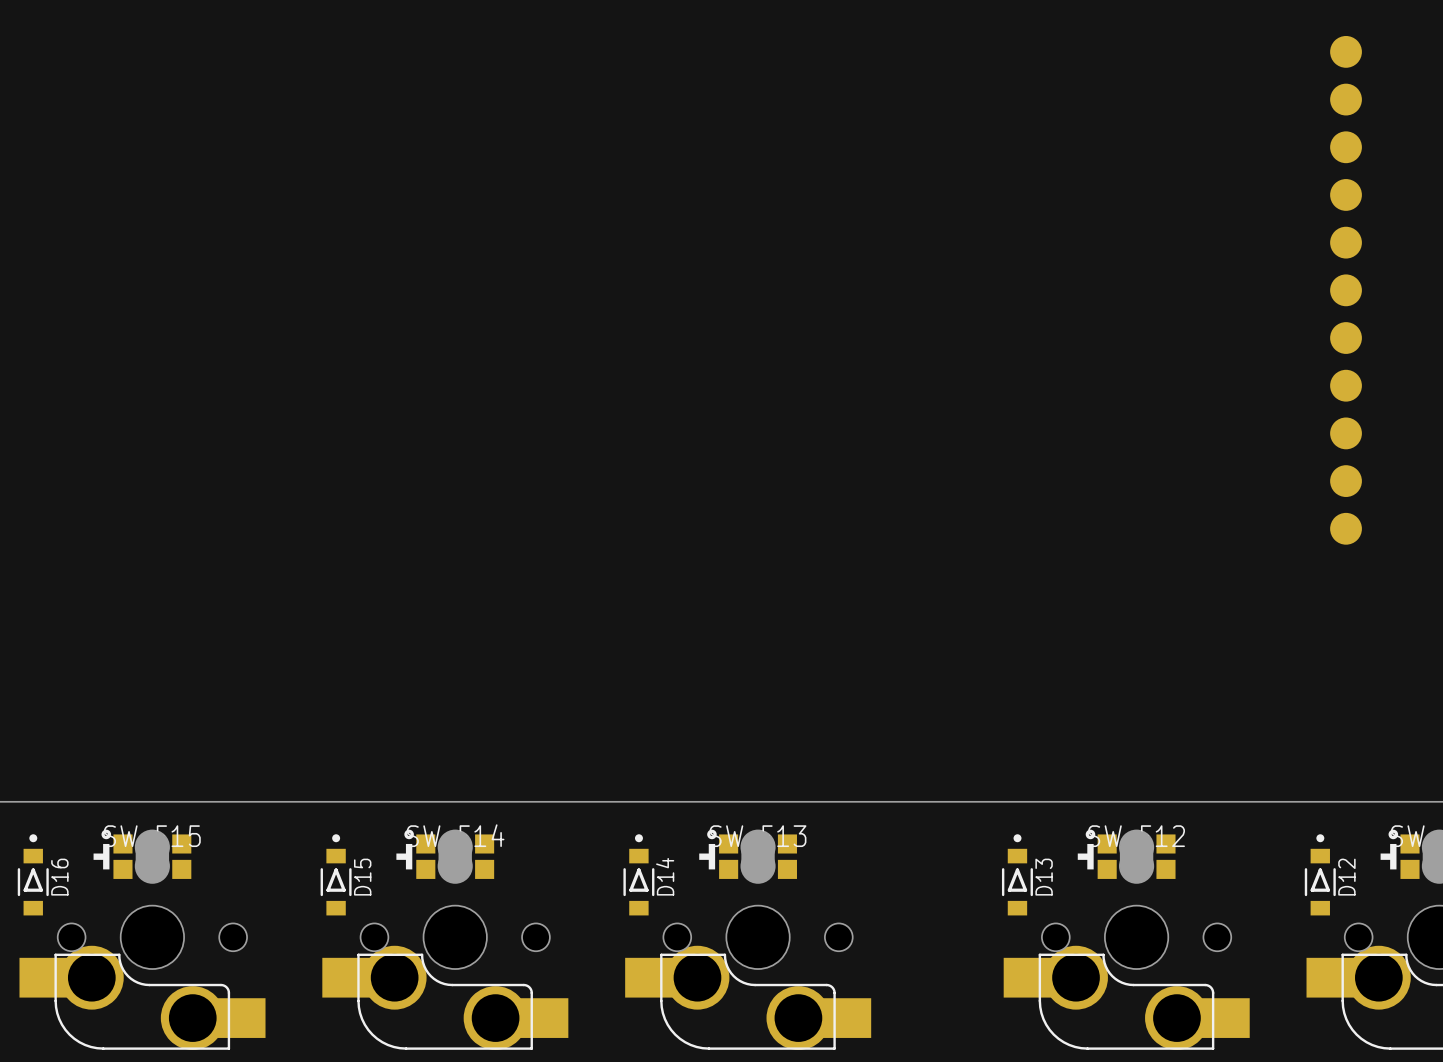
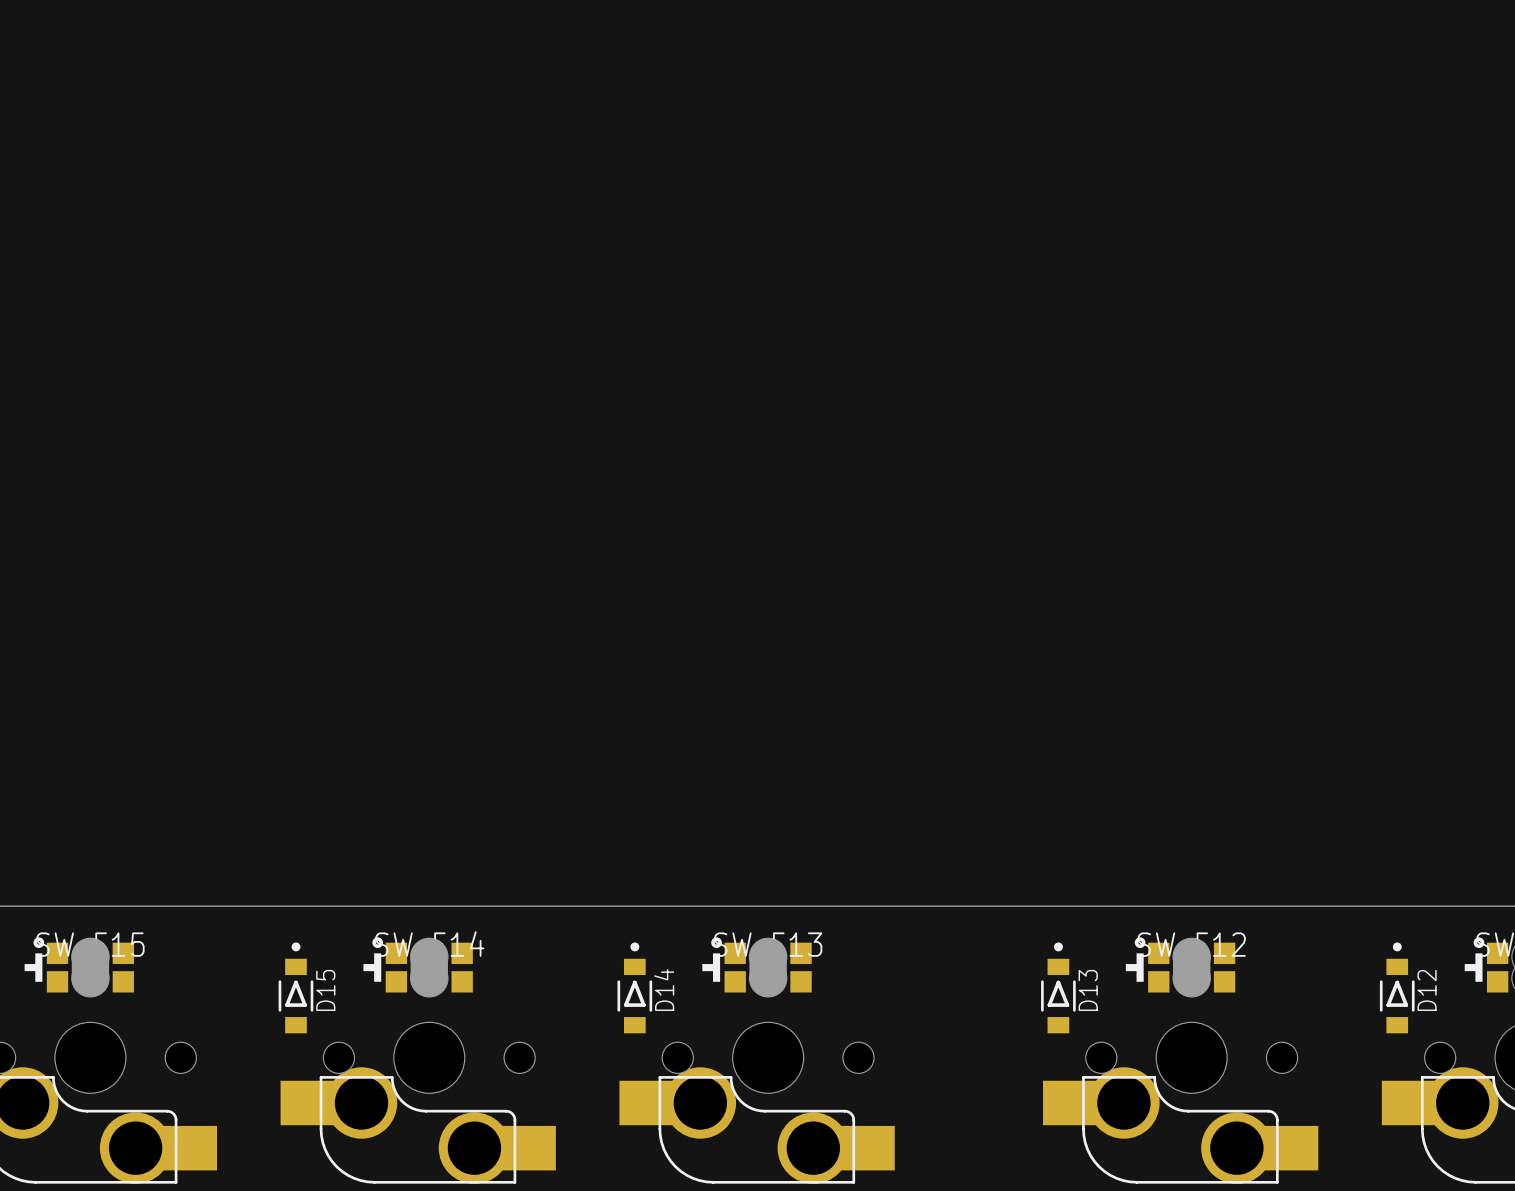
part: (1346, 51) -> none
part: (1346, 99) -> none
part: (1346, 147) -> none
part: (1346, 194) -> none
part: (1346, 242) -> none
part: (1346, 290) -> none
part: (1346, 338) -> none
part: (1346, 385) -> none
part: (1346, 433) -> none
part: (1346, 481) -> none
part: (1346, 528) -> none

